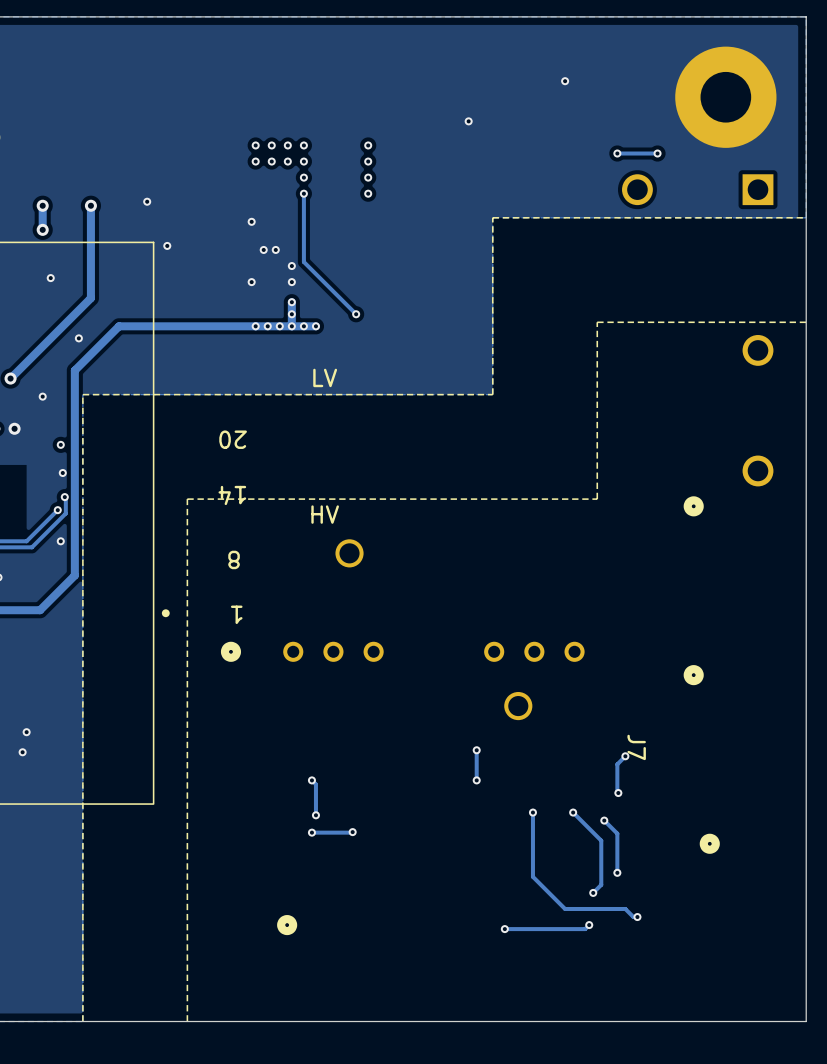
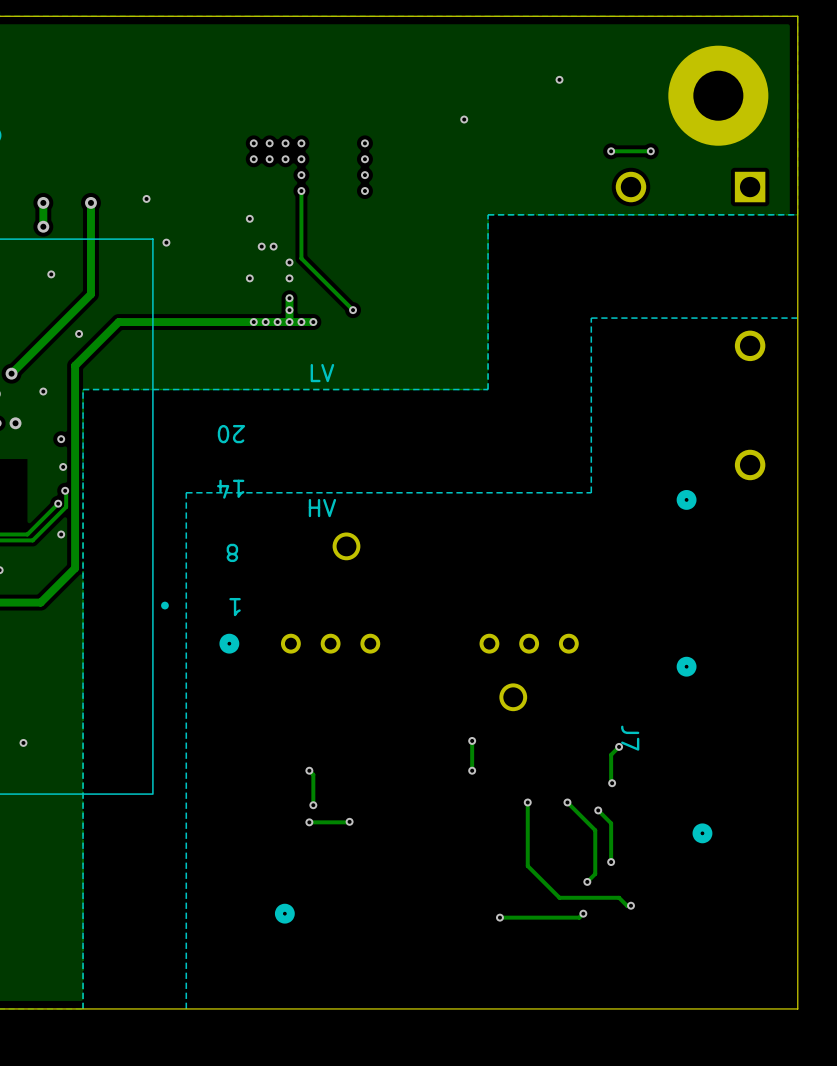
via: (26, 732) -> none

